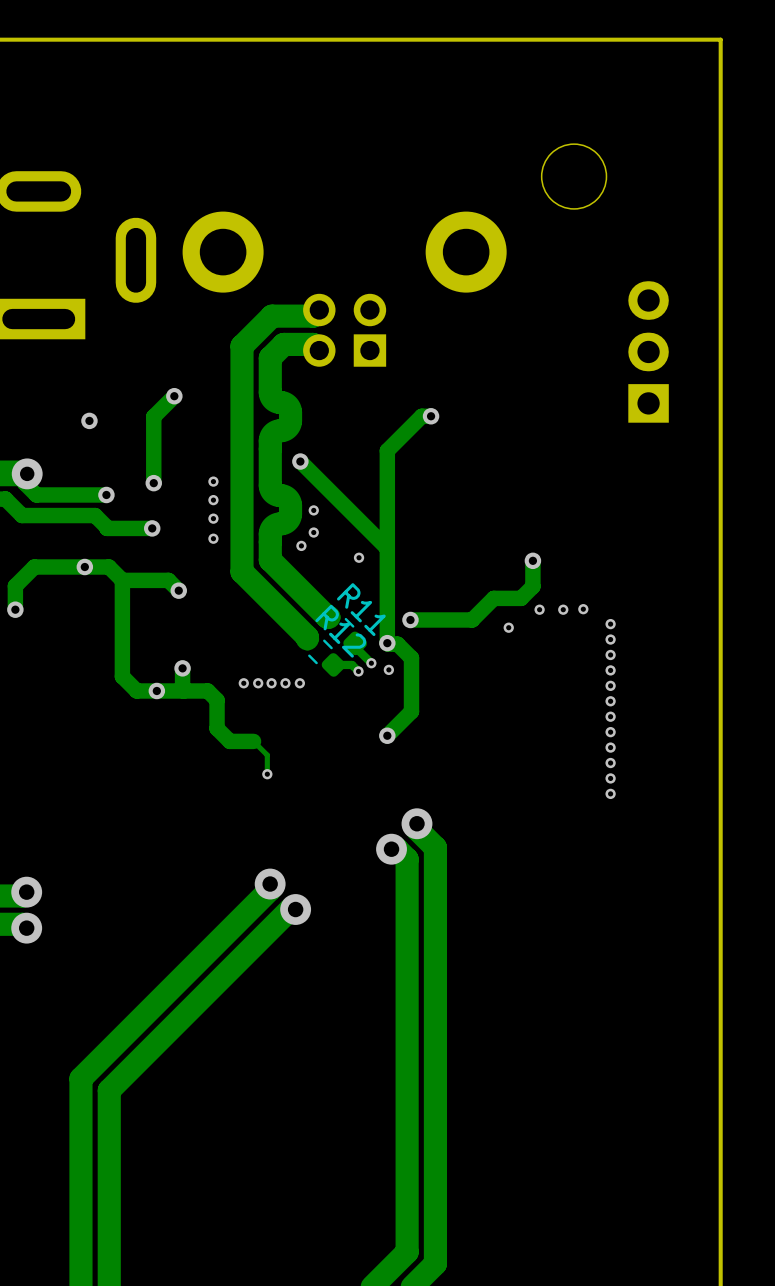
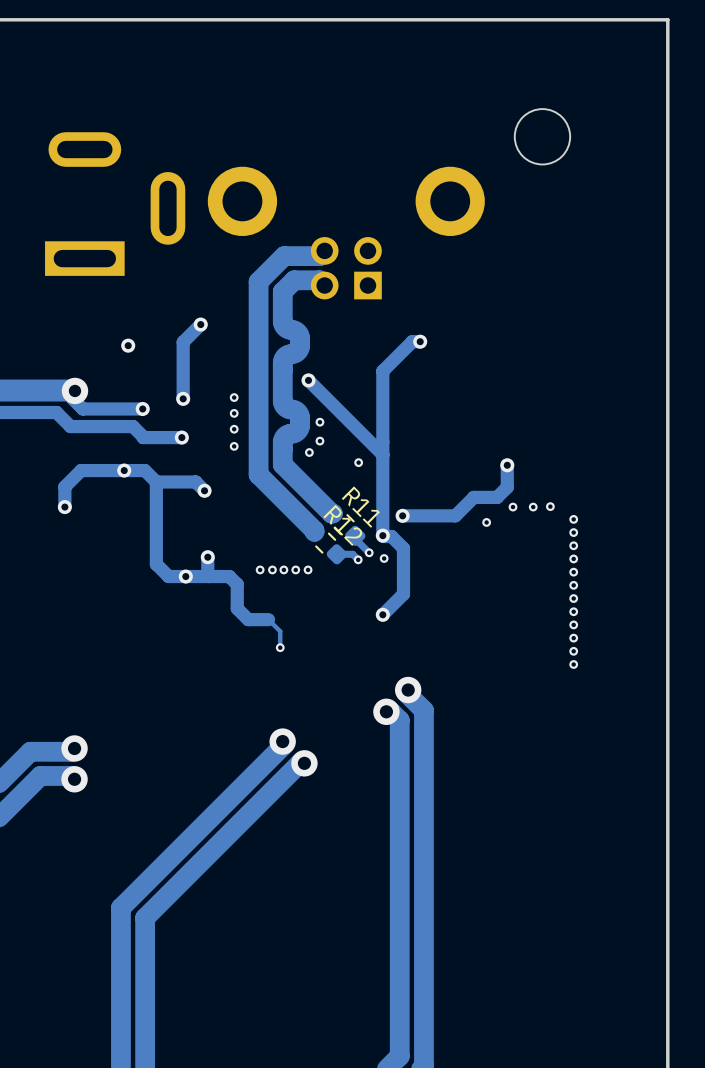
part: (648, 351) -> none

